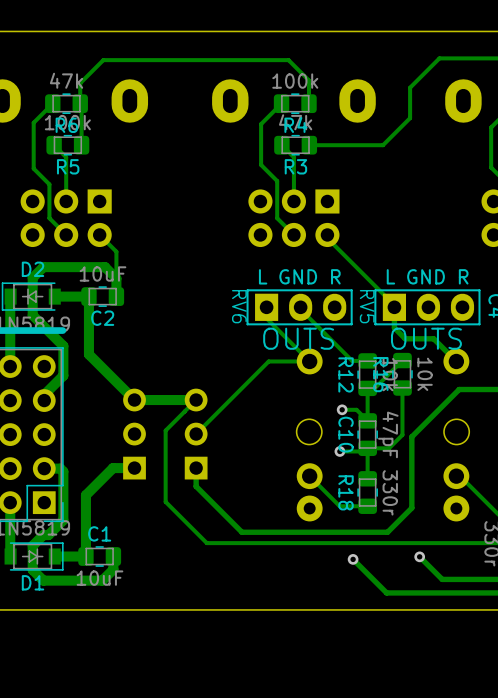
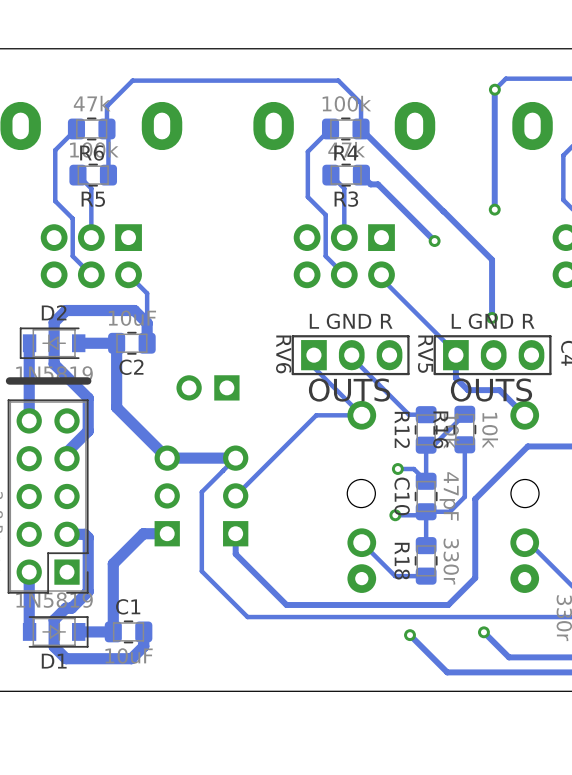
track: (429, 68) (410, 87) (410, 118) (383, 145) (309, 145) -> (494, 89) (494, 209)
via: none -> (494, 89)
track: none -> (361, 128) (443, 211)
track: none -> (361, 175) (370, 184) (377, 184) (434, 241)
via: none -> (494, 209)
track: none -> (443, 211) (492, 259) (492, 317)
via: none -> (434, 241)
via: none -> (492, 317)
part: none -> (208, 387)

